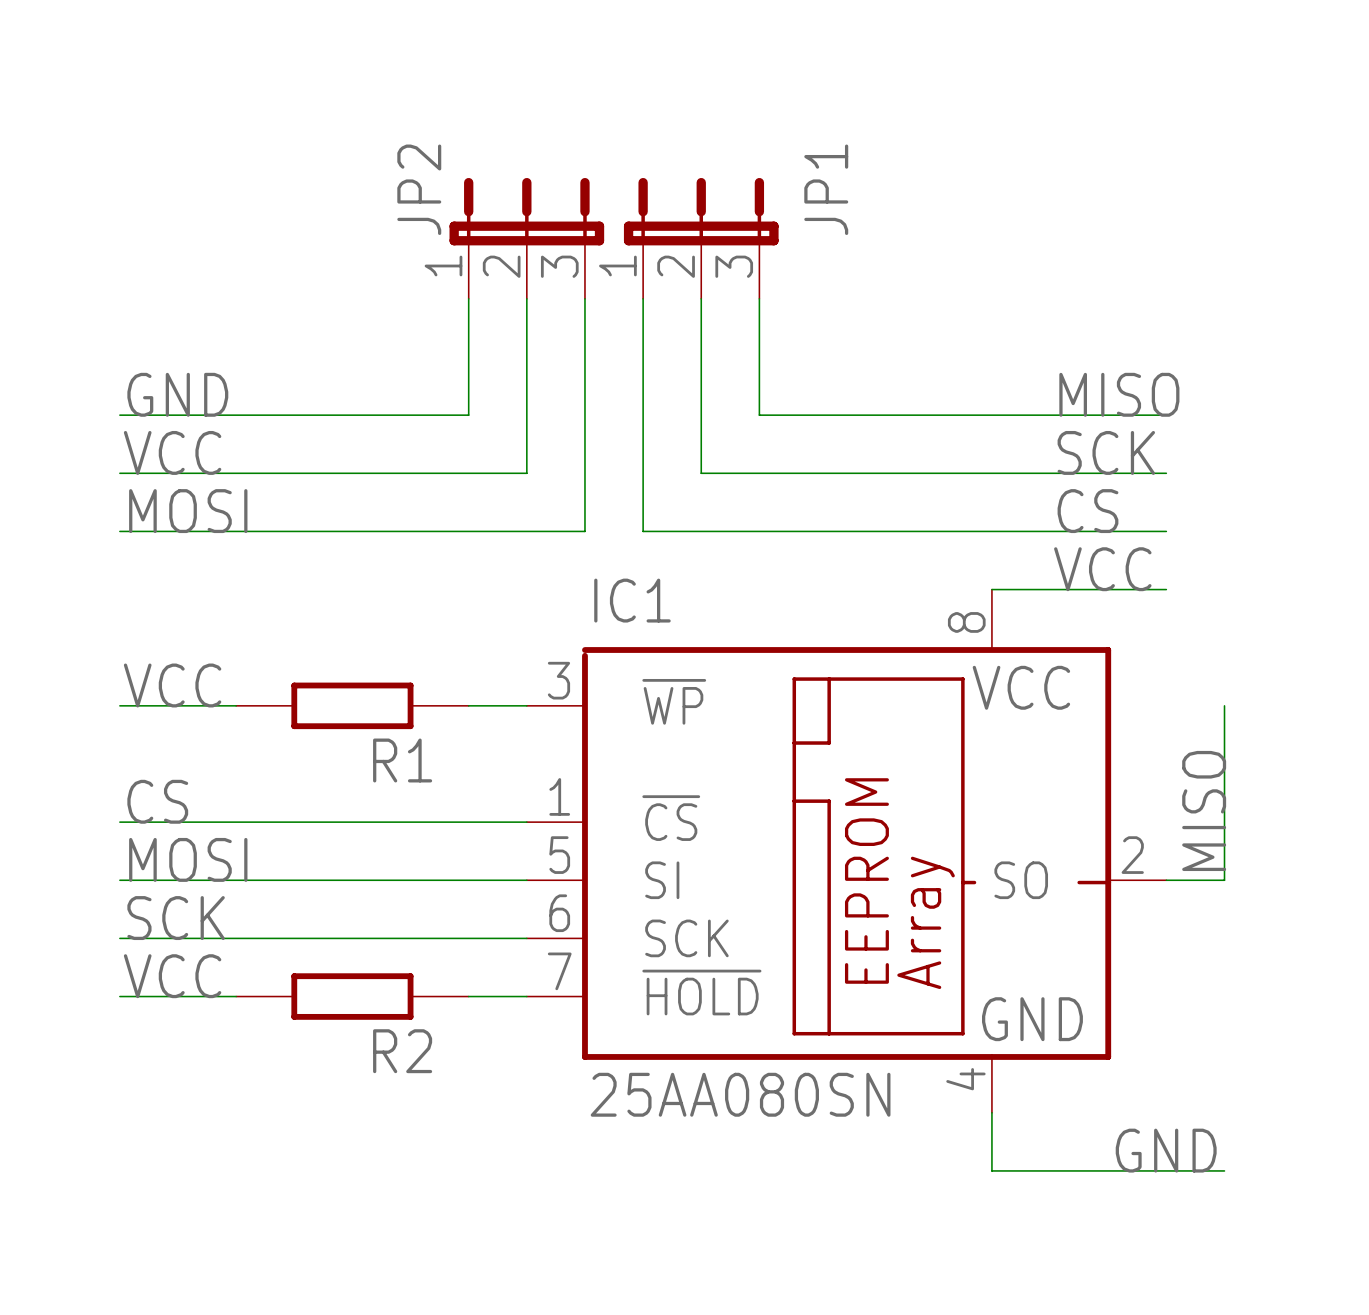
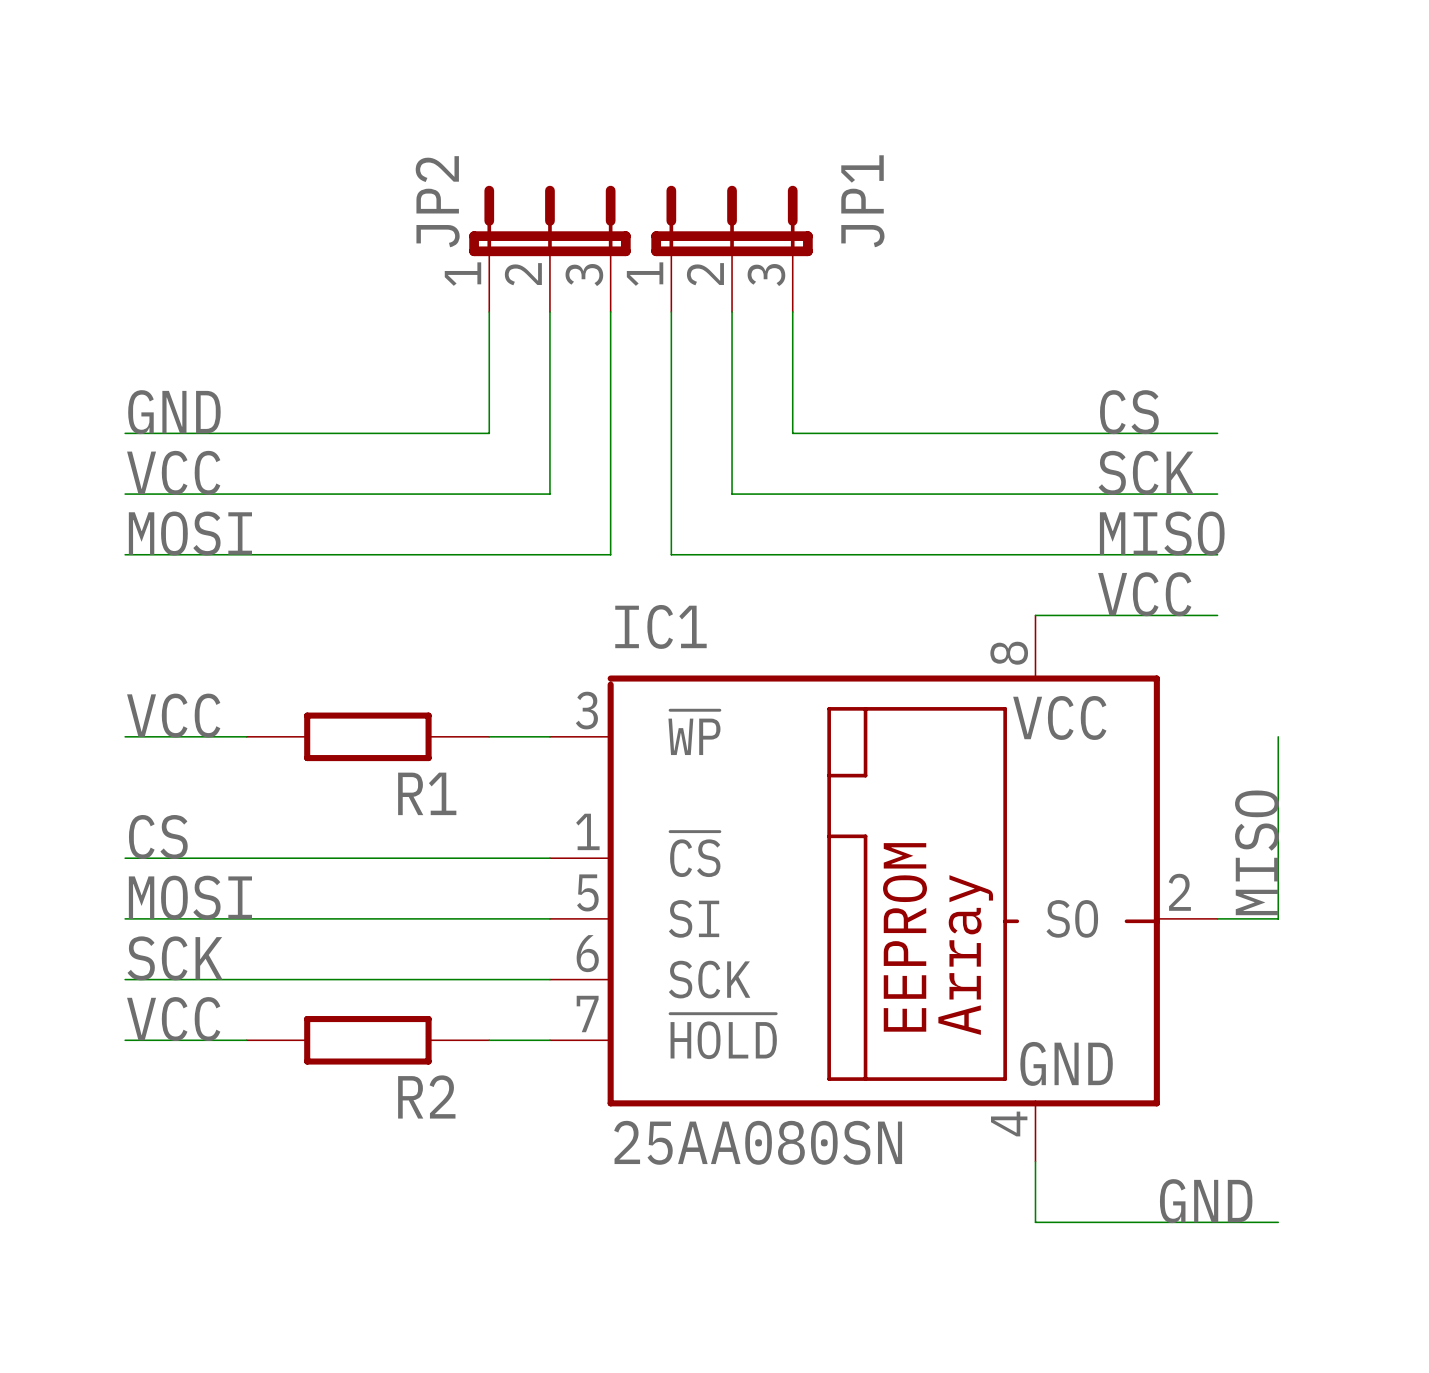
label: MISO (1119, 394) -> CS (1129, 412)
label: CS (1087, 511) -> MISO (1162, 533)

